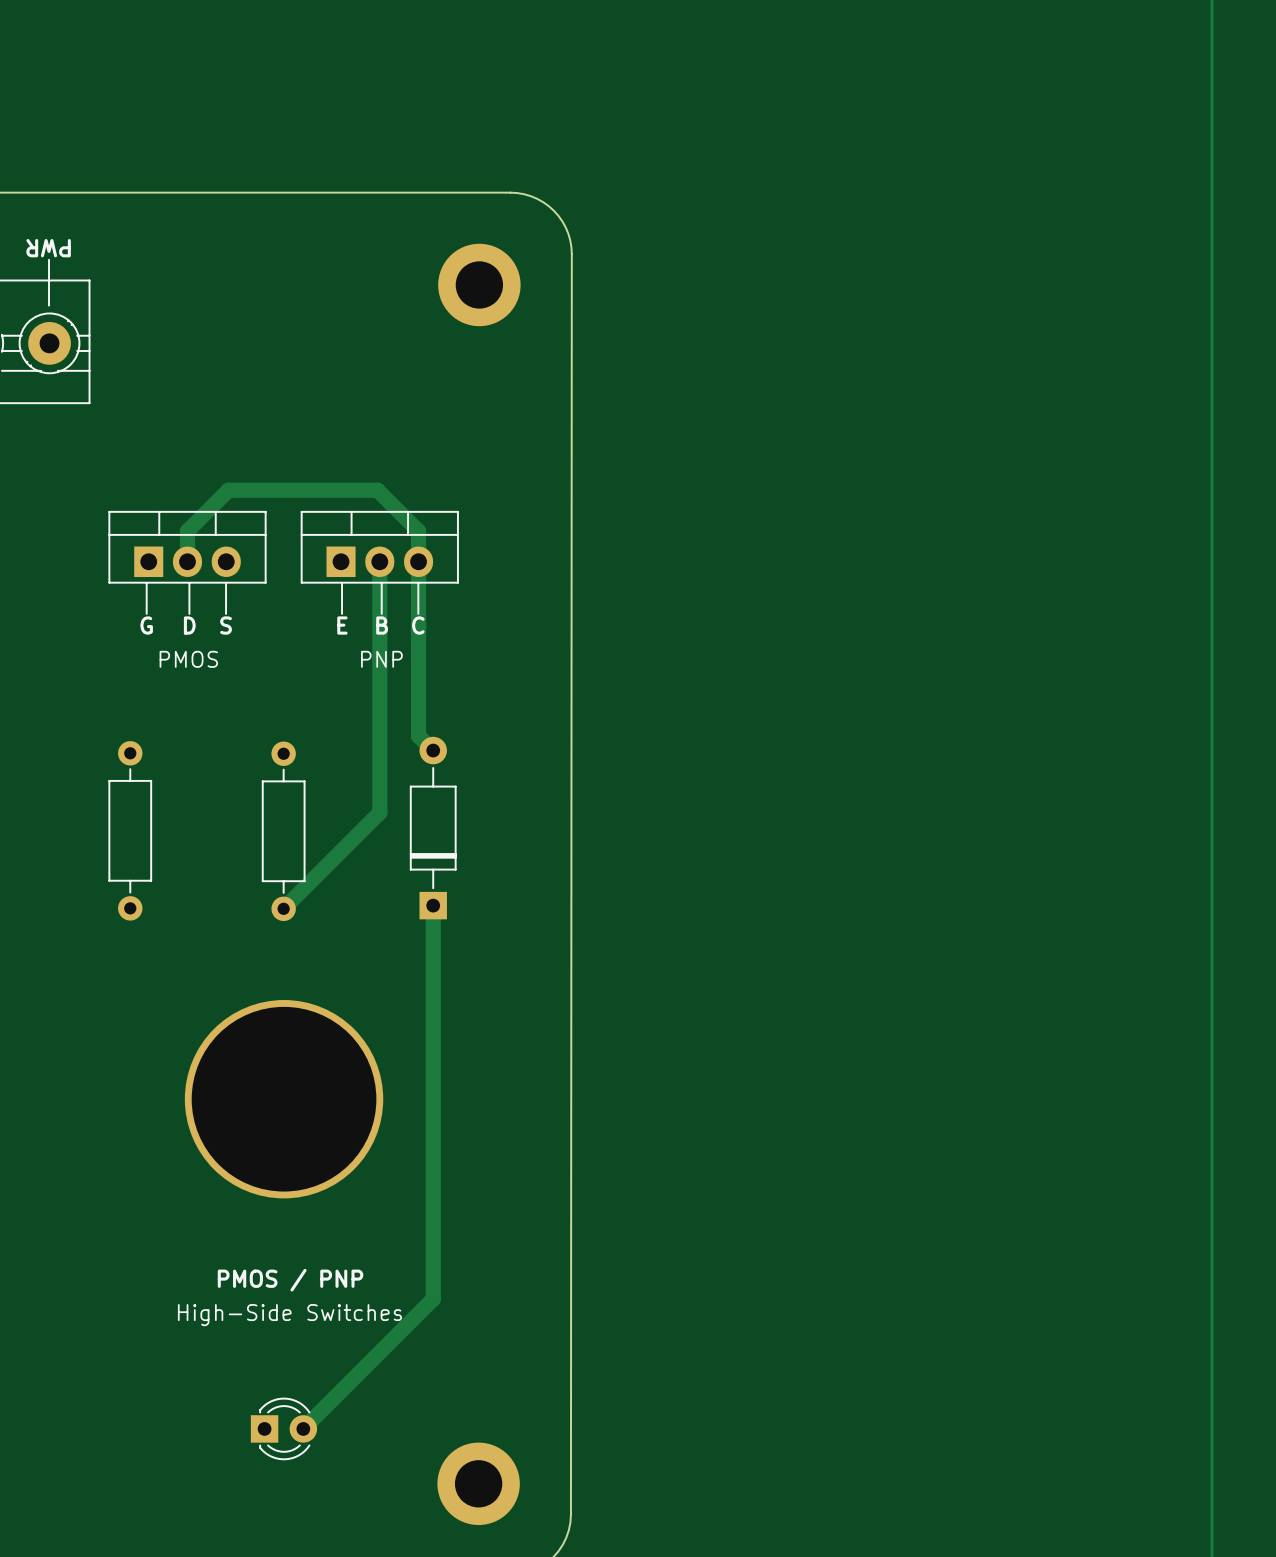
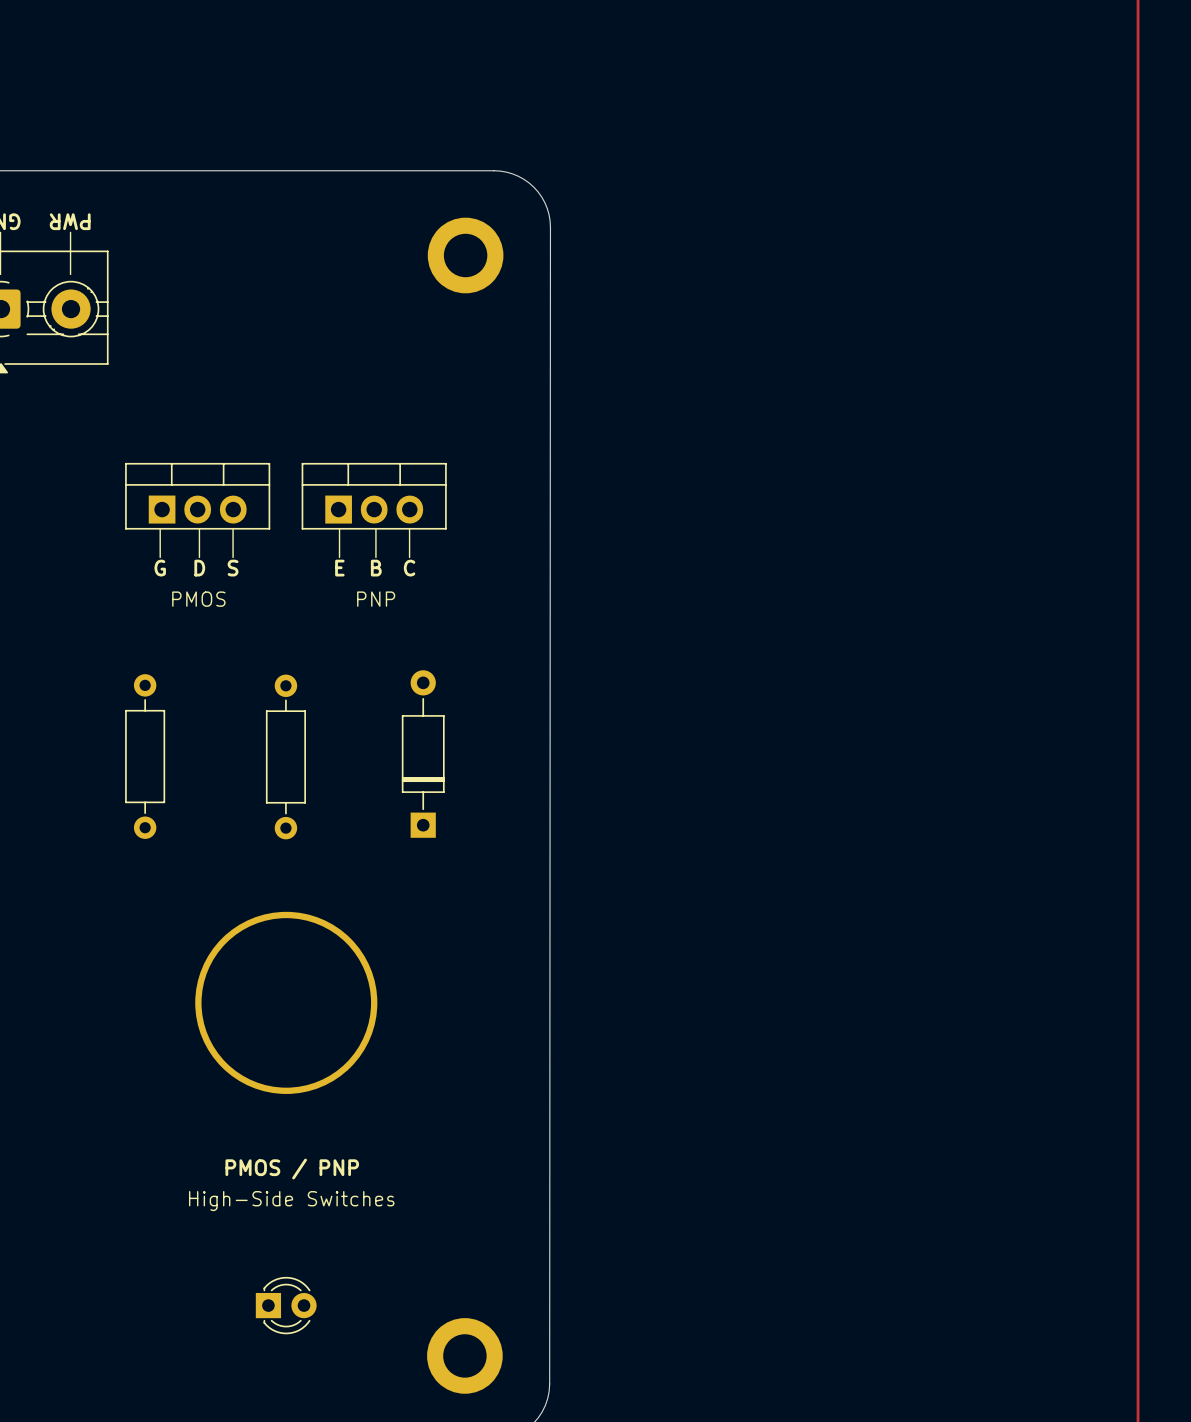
track: (187, 561) (187, 531) (228, 490) (377, 490) (418, 531) (418, 735) (433, 750) -> none
track: (379, 561) (379, 812) (283, 908) -> none
track: (433, 905) (433, 1299) (303, 1428) -> none

